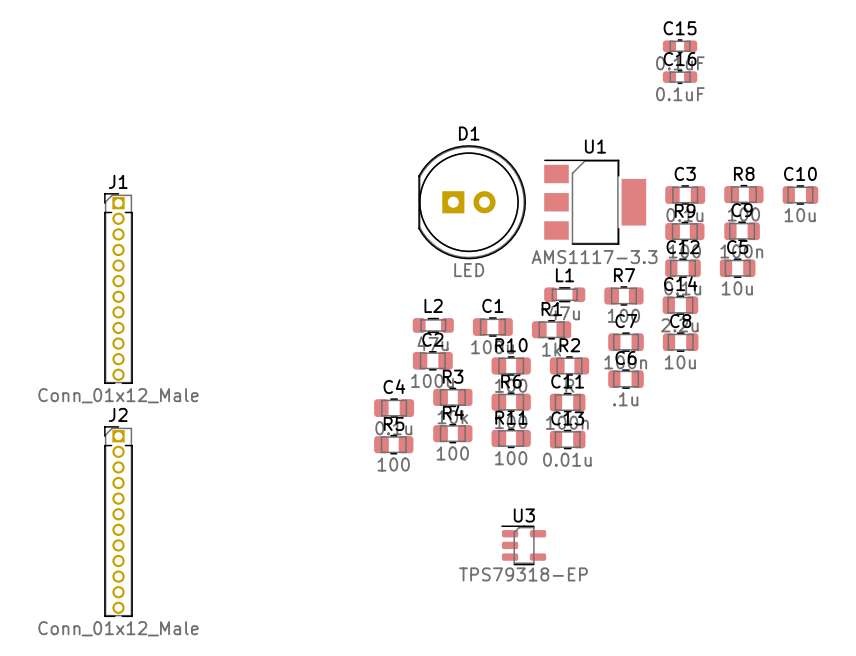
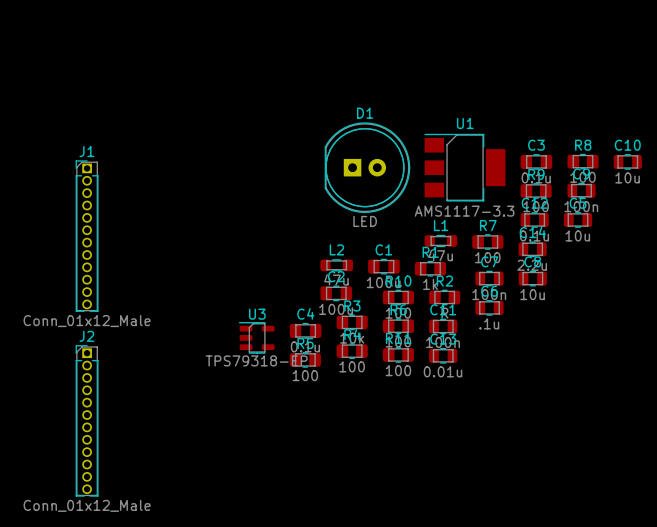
C15: 0.1uF (680, 46) -> none
C16: 0.1uF (680, 77) -> none
U3 position: (523, 545) -> (256, 337)

